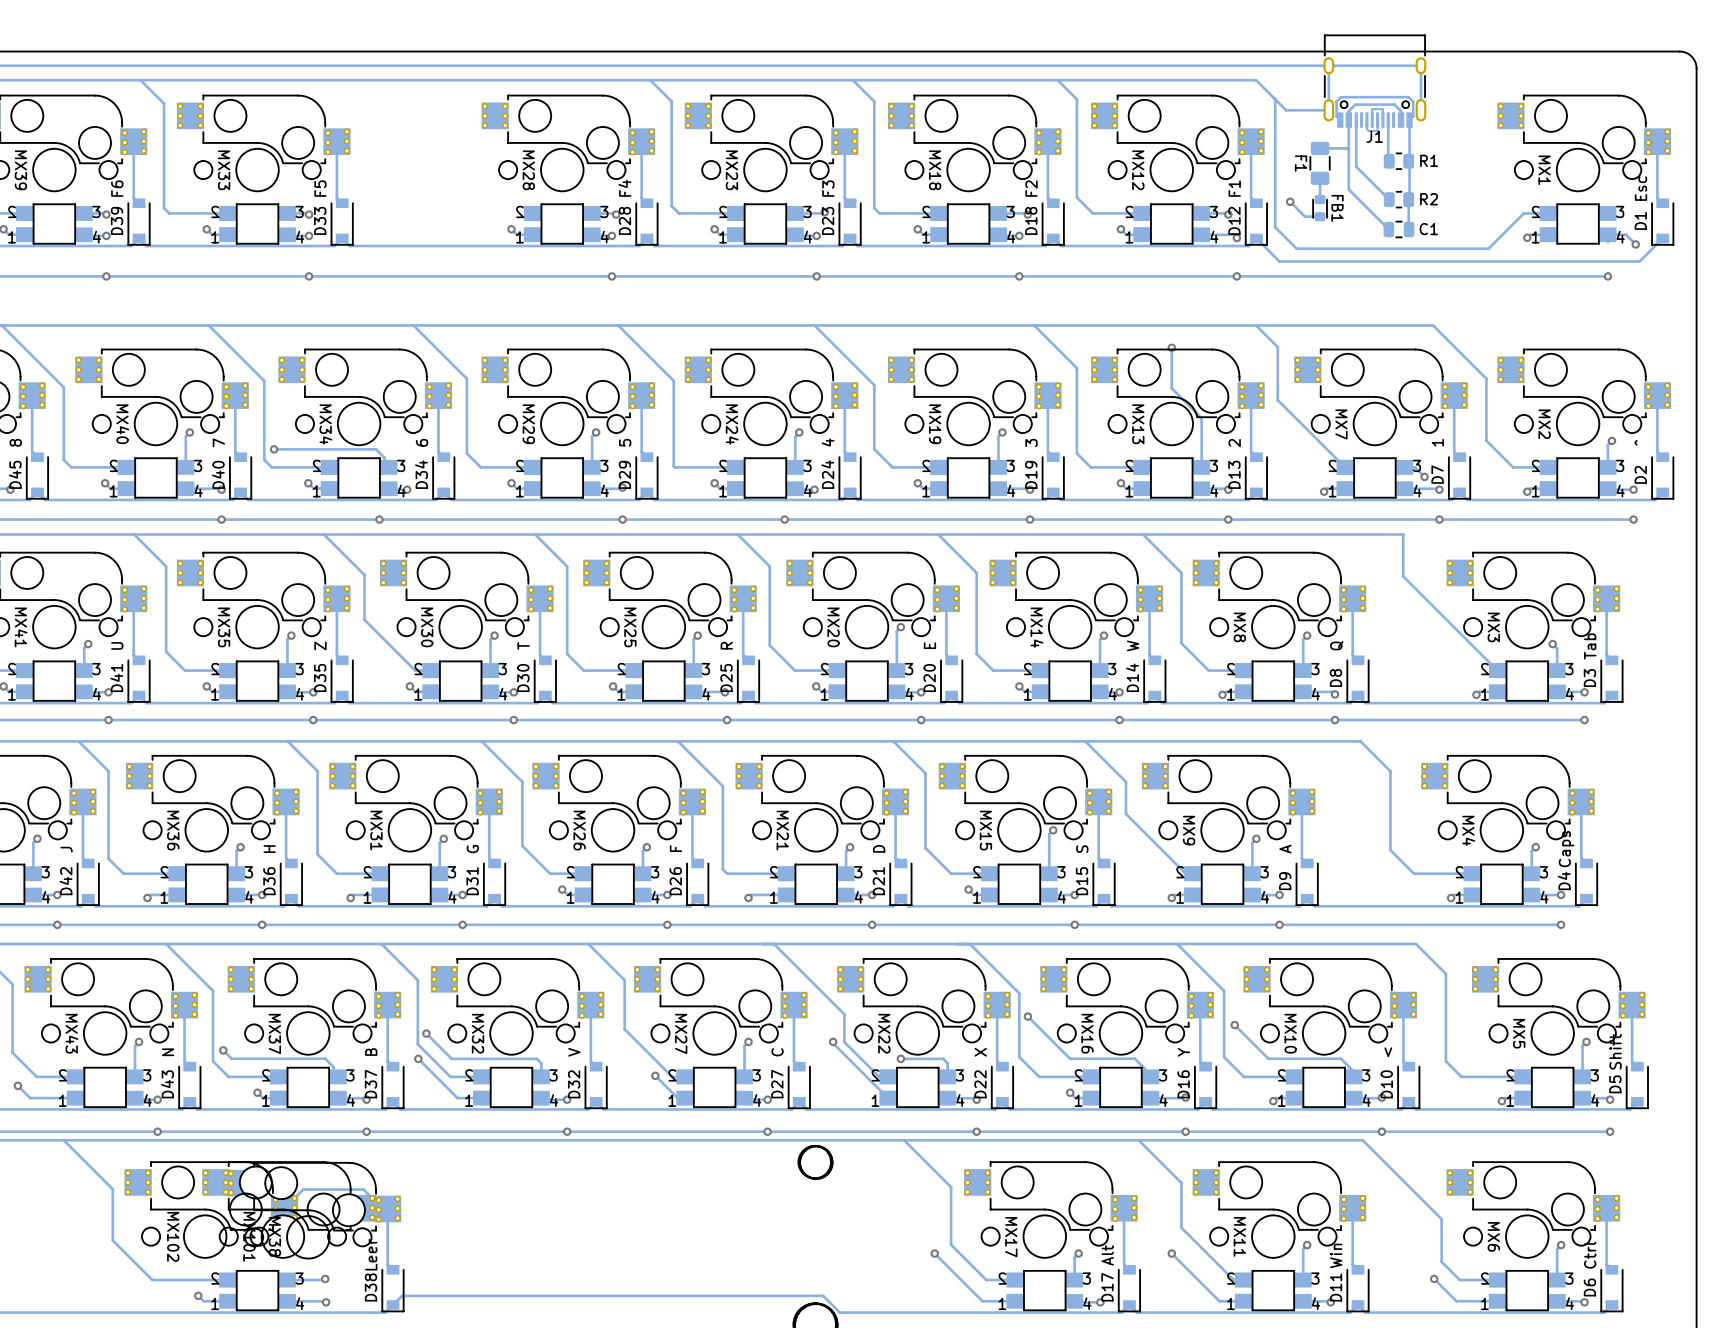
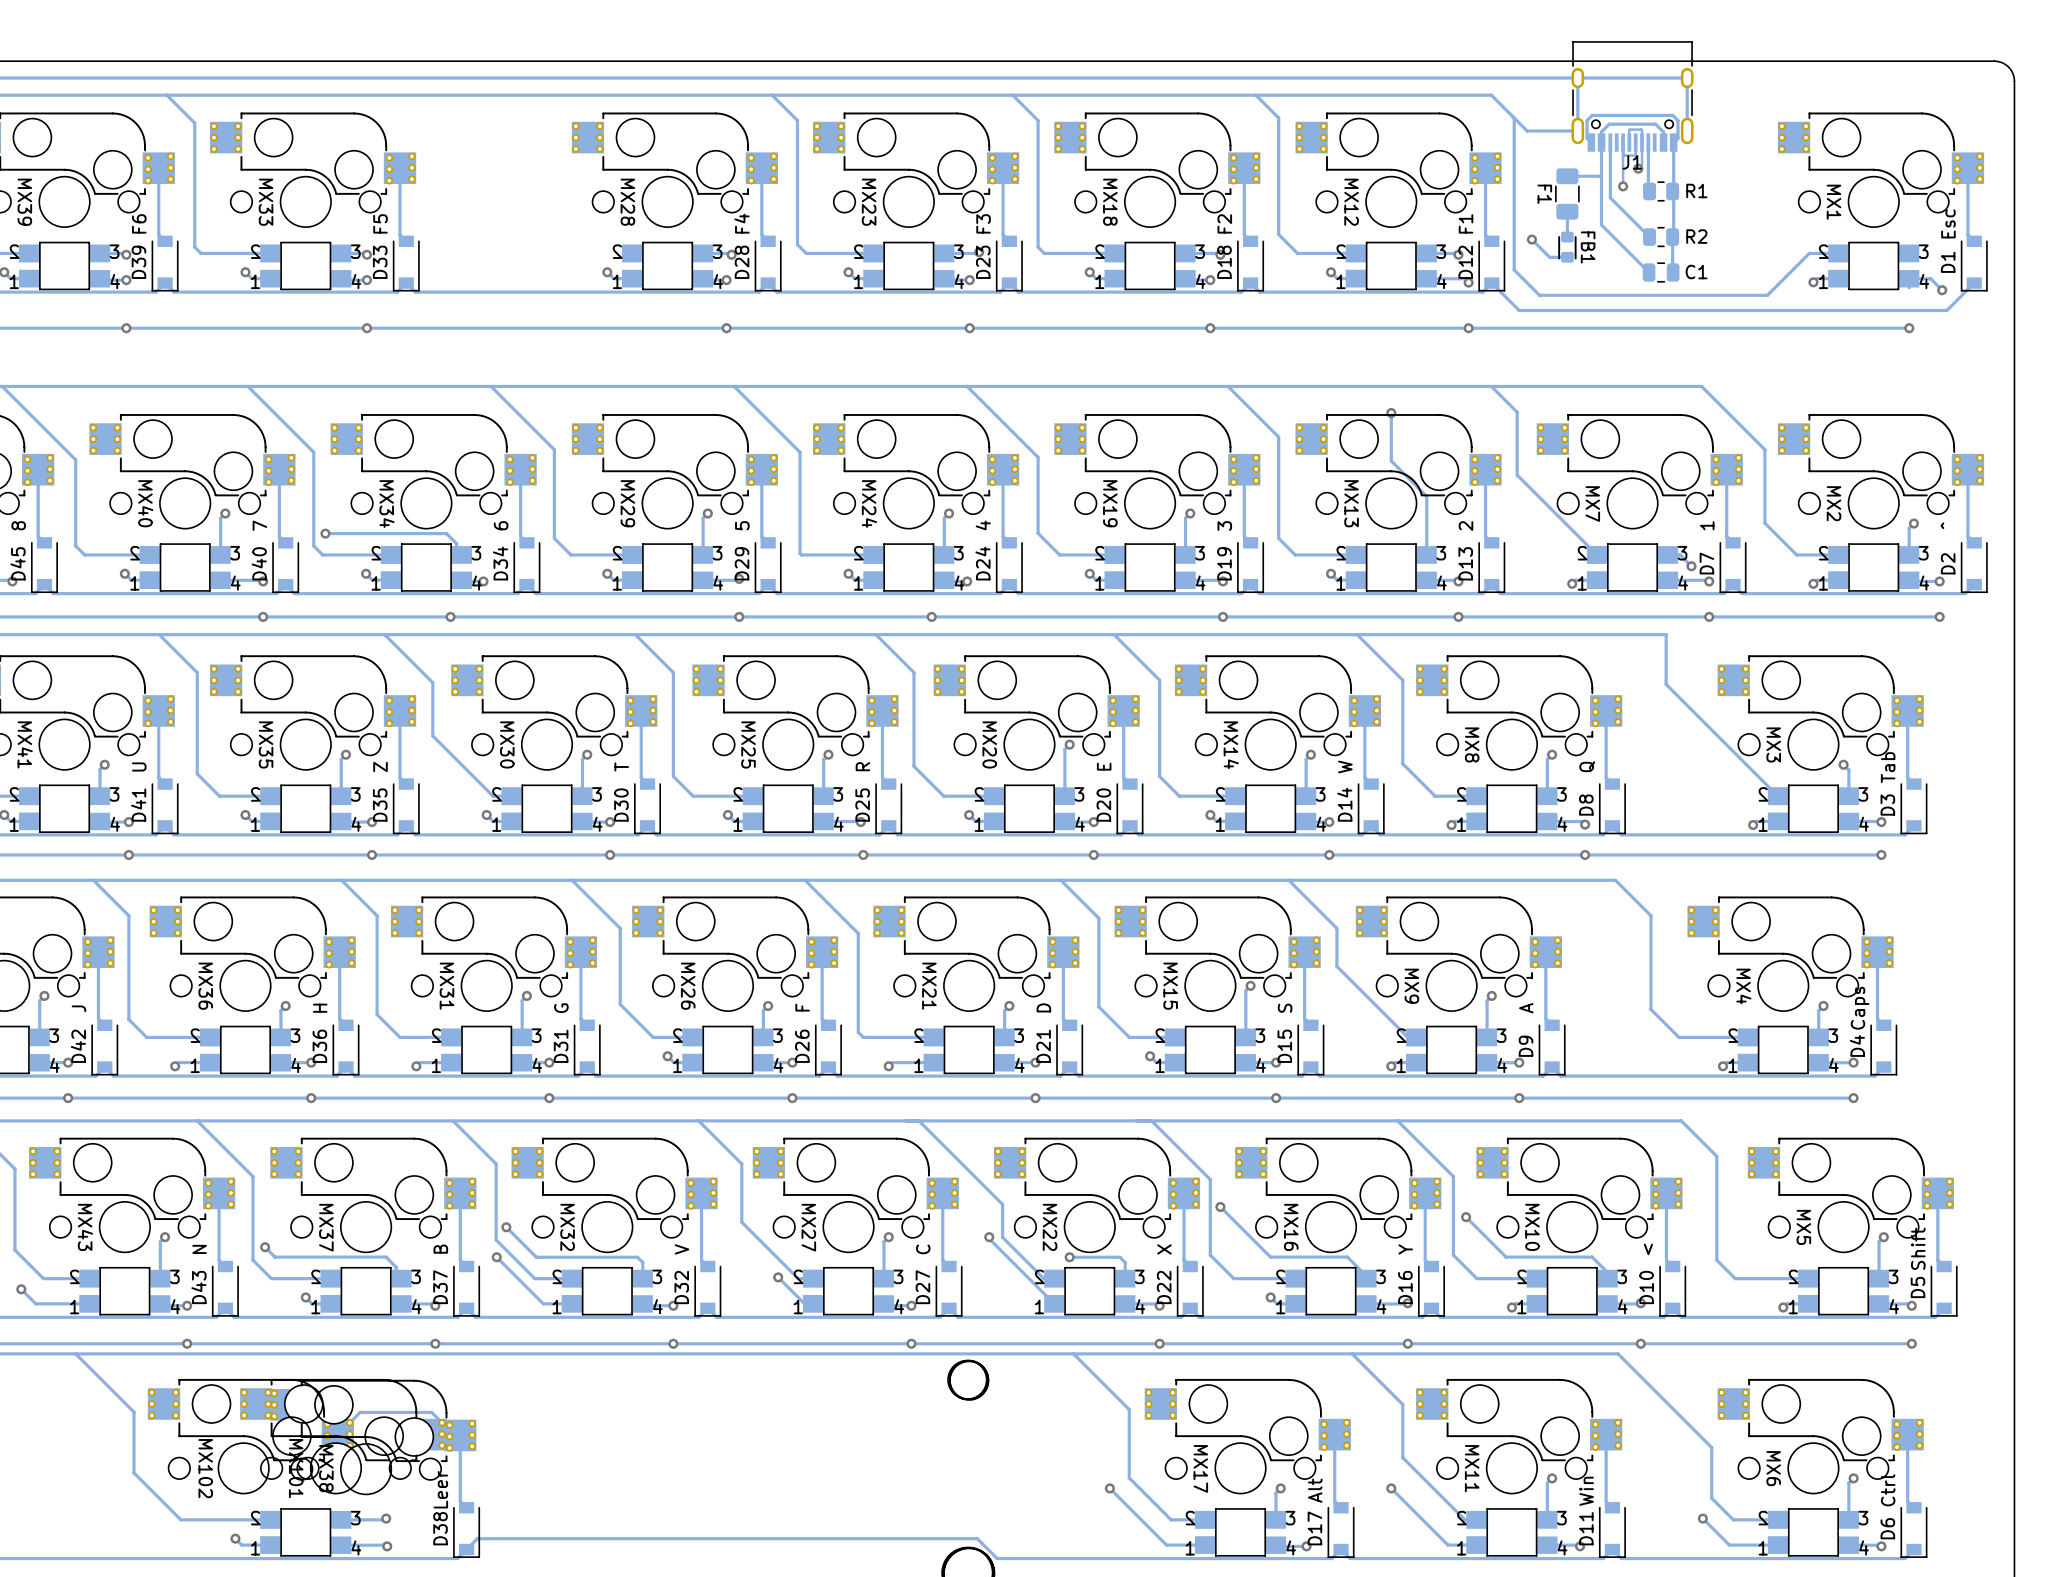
track: none -> (1642, 142) (1642, 164) (1638, 168)
track: none -> (1623, 153) (1623, 168)
track: none -> (1623, 168) (1623, 186)
via: none -> (1638, 168)
via: none -> (1623, 186)

